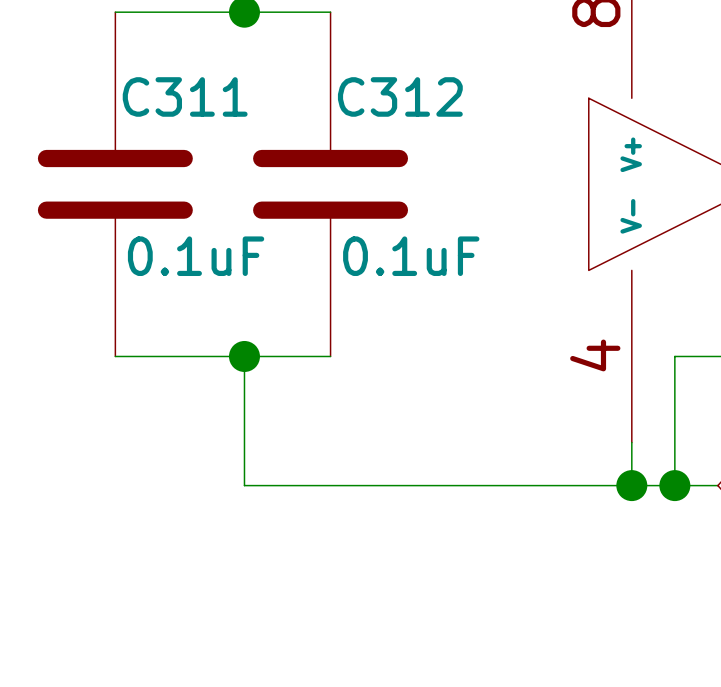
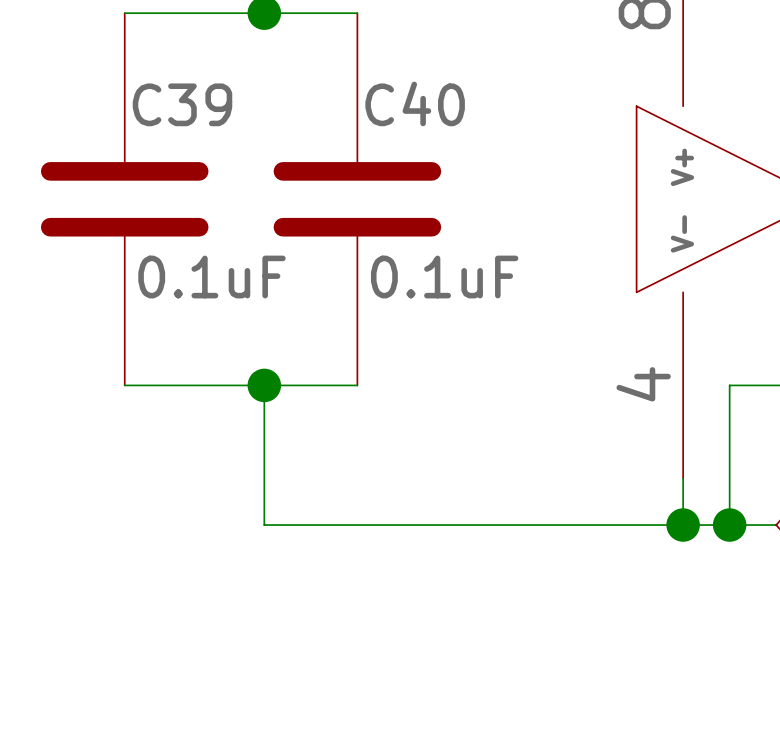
C311 name: C311 (185, 96) -> C39 (182, 104)
C312 name: C312 (400, 96) -> C40 (415, 103)

